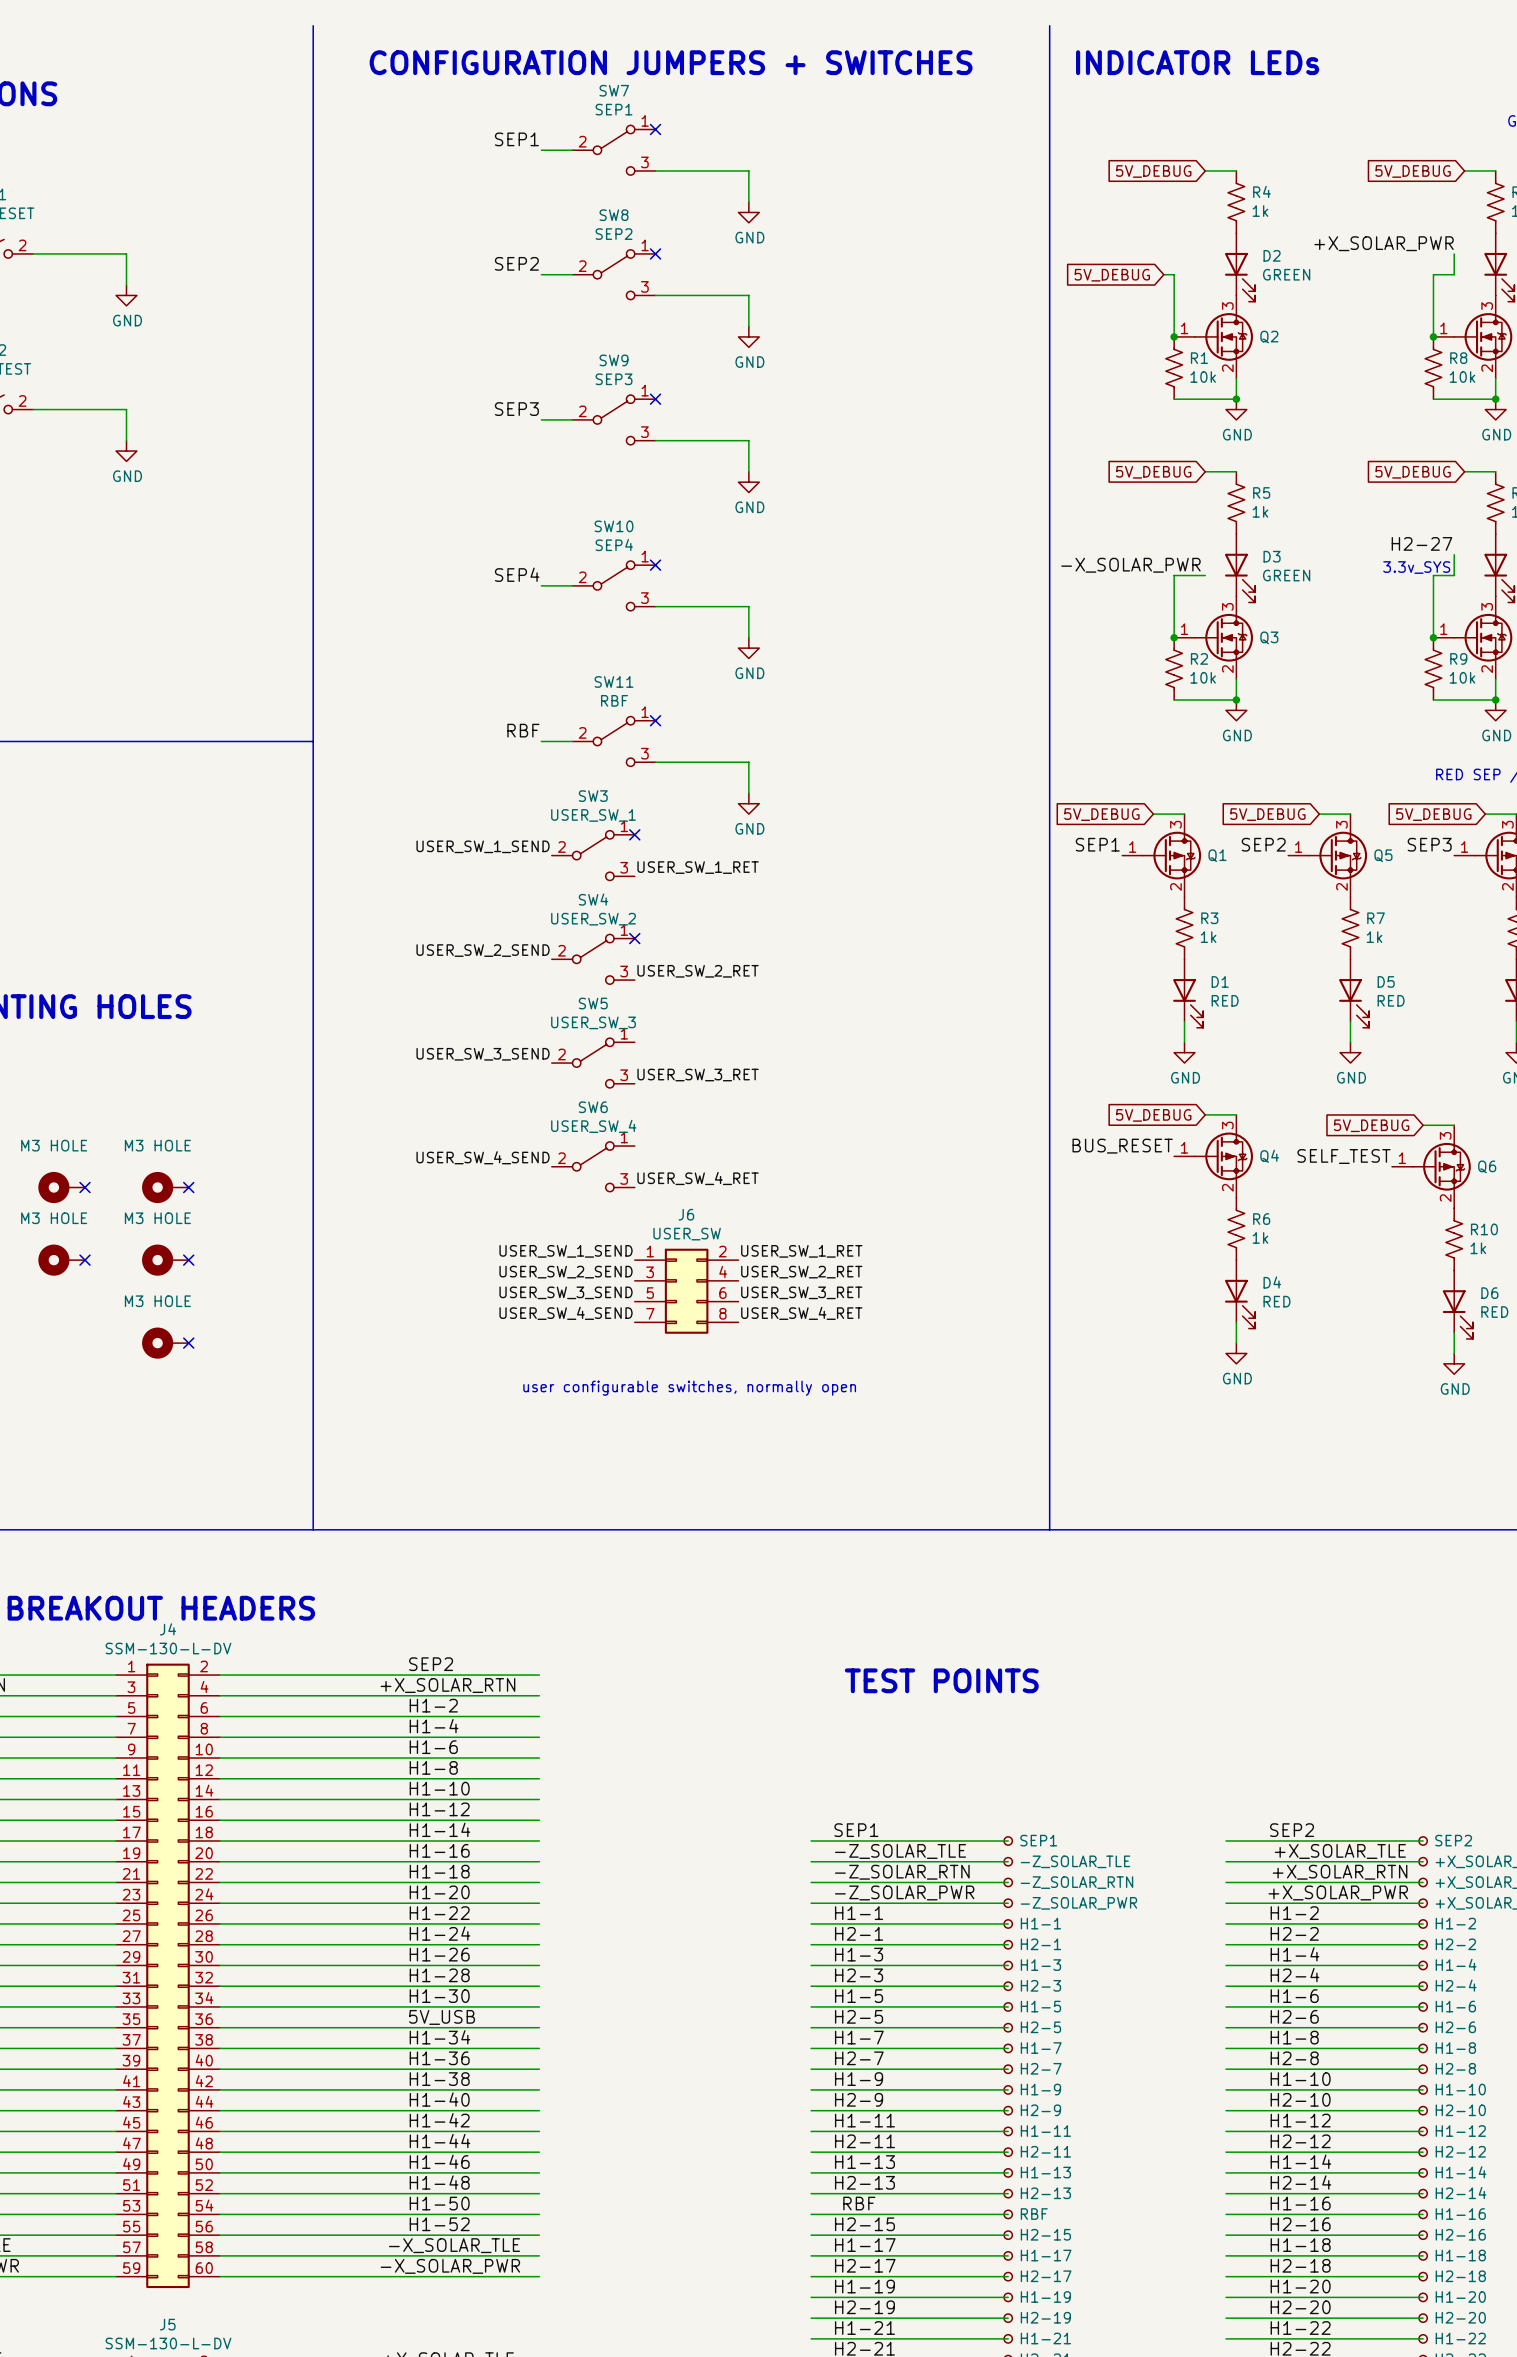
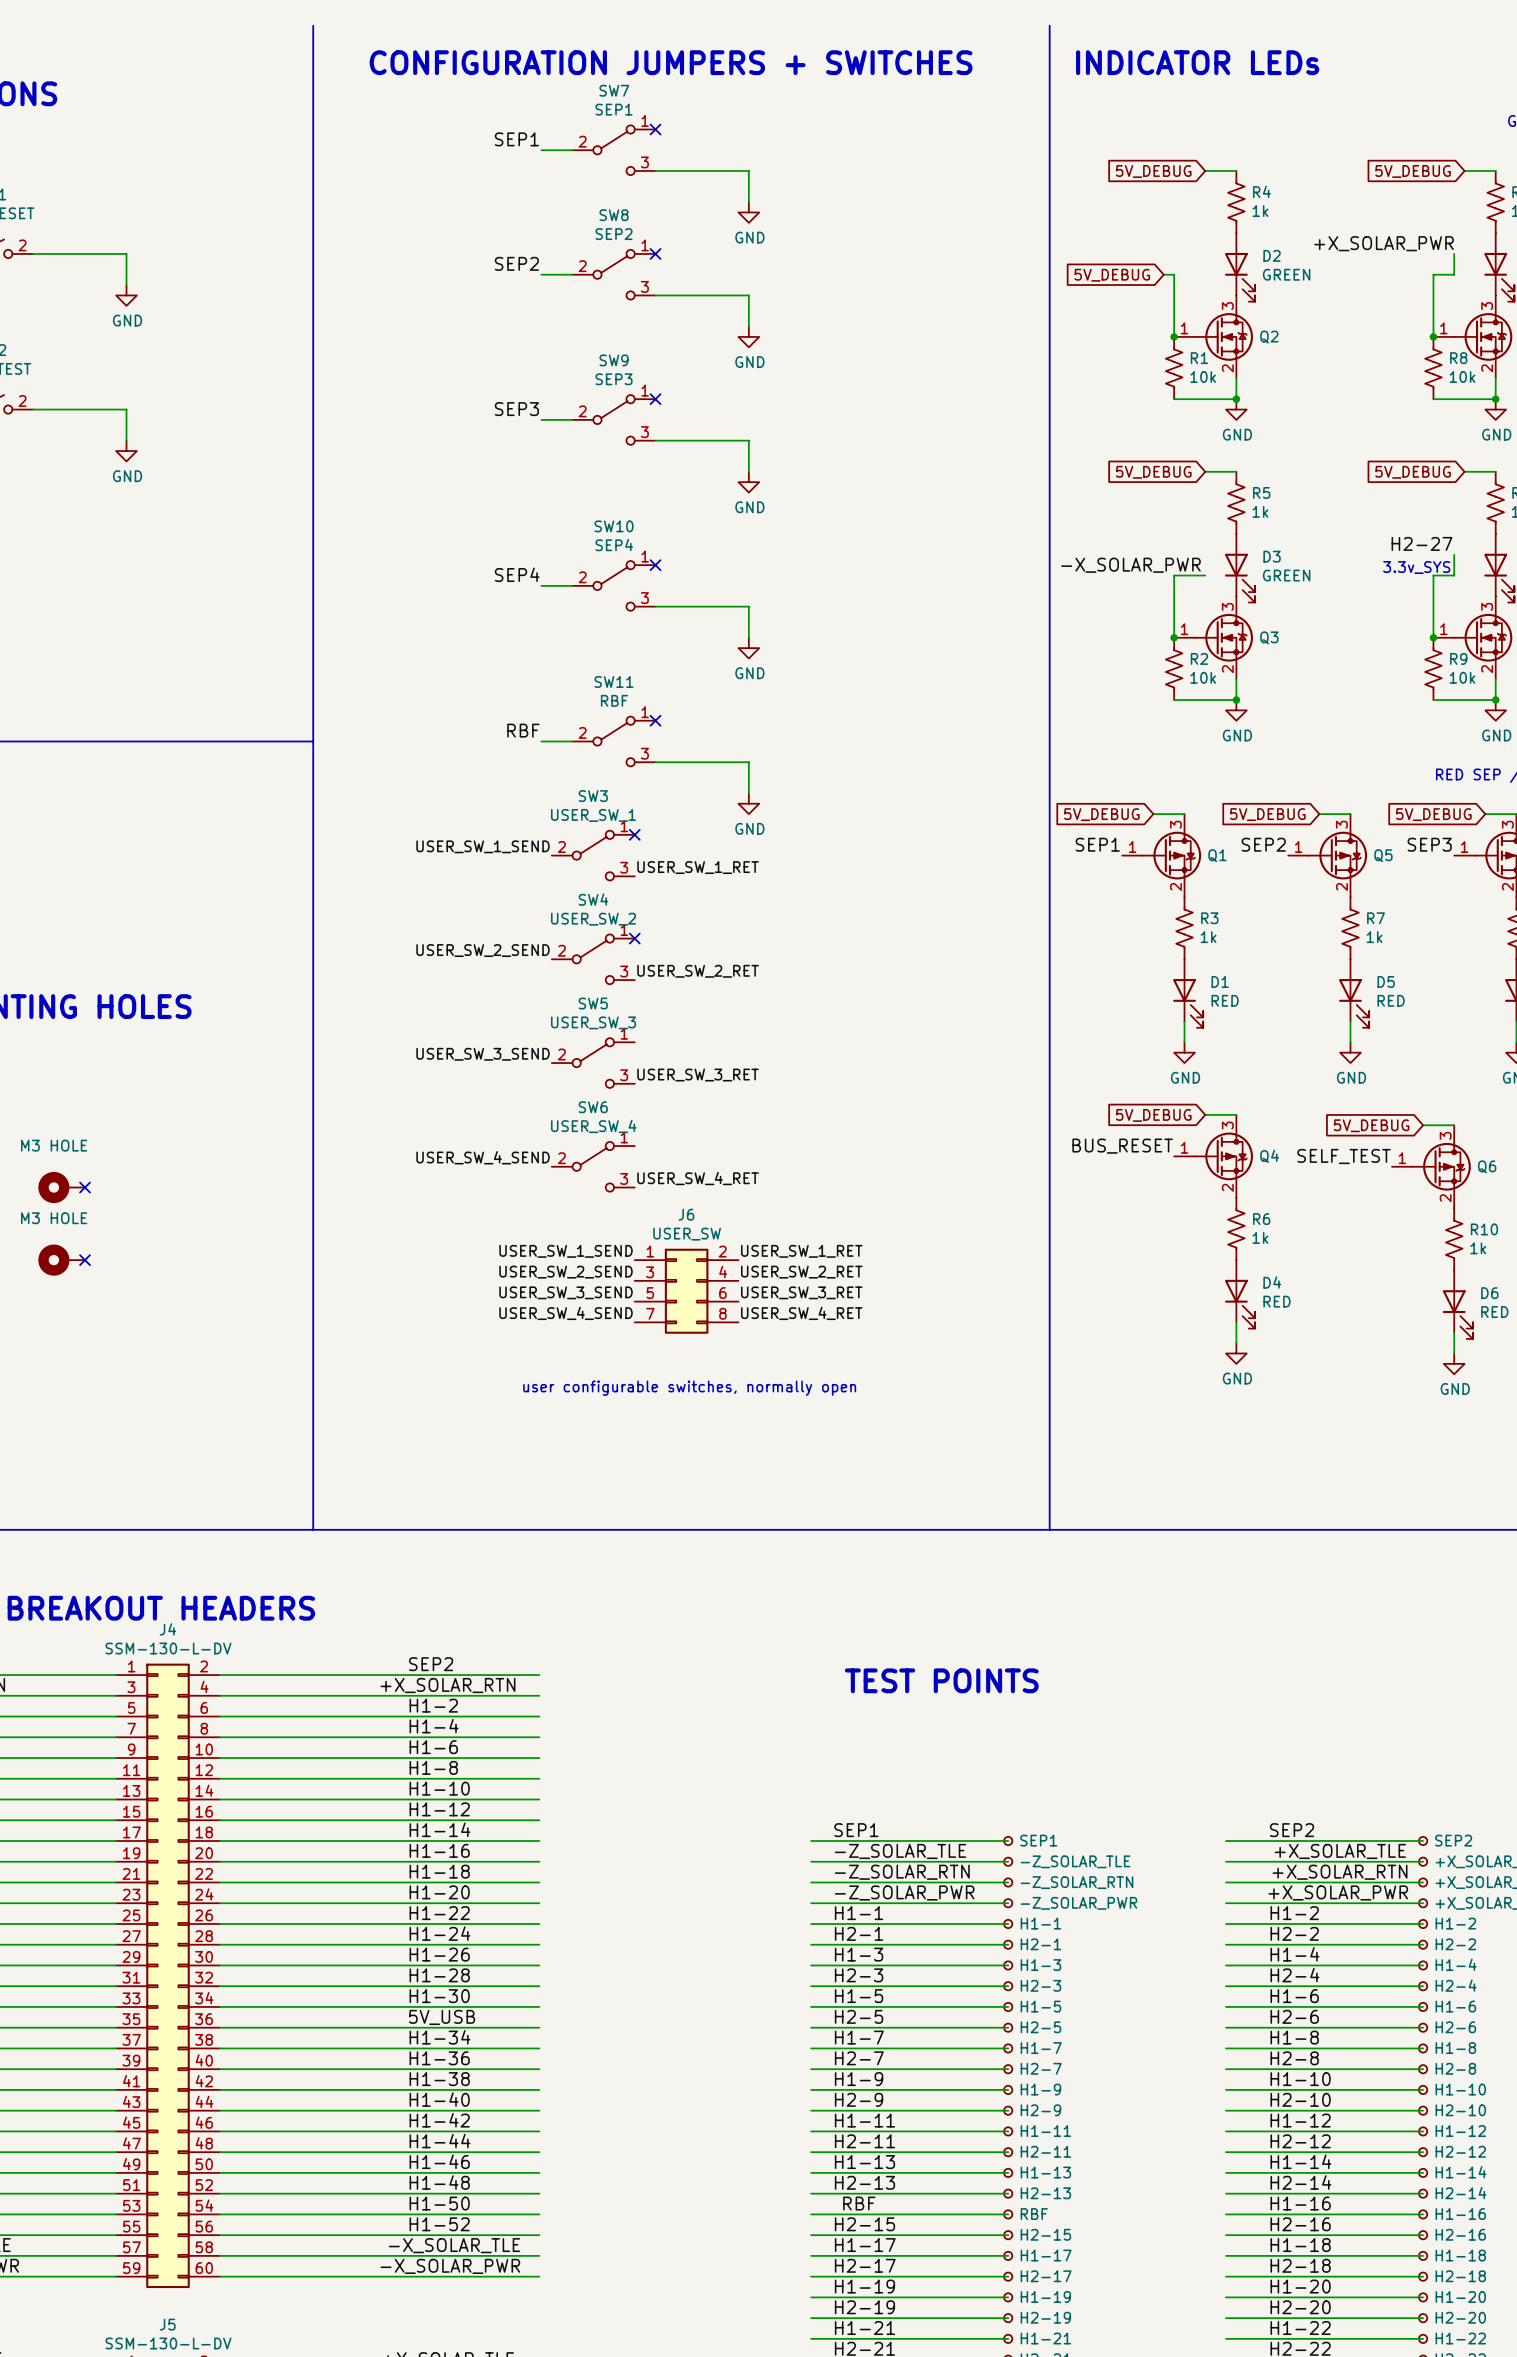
part: M3 HOLE (165, 1187) -> none
no-connect mark: (188, 1187) -> none
part: M3 HOLE (165, 1260) -> none
no-connect mark: (188, 1260) -> none
part: M3 HOLE (165, 1343) -> none
no-connect mark: (188, 1343) -> none

